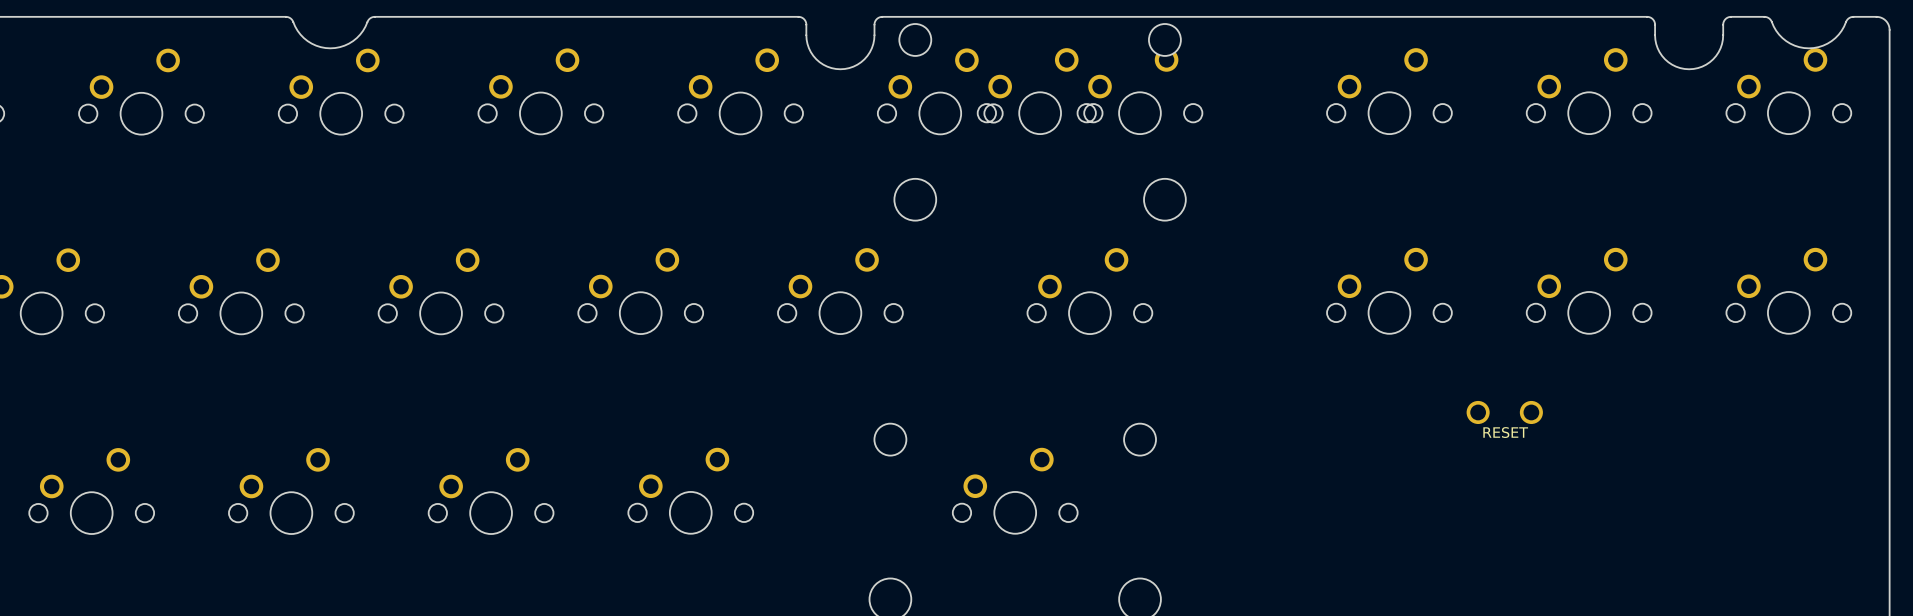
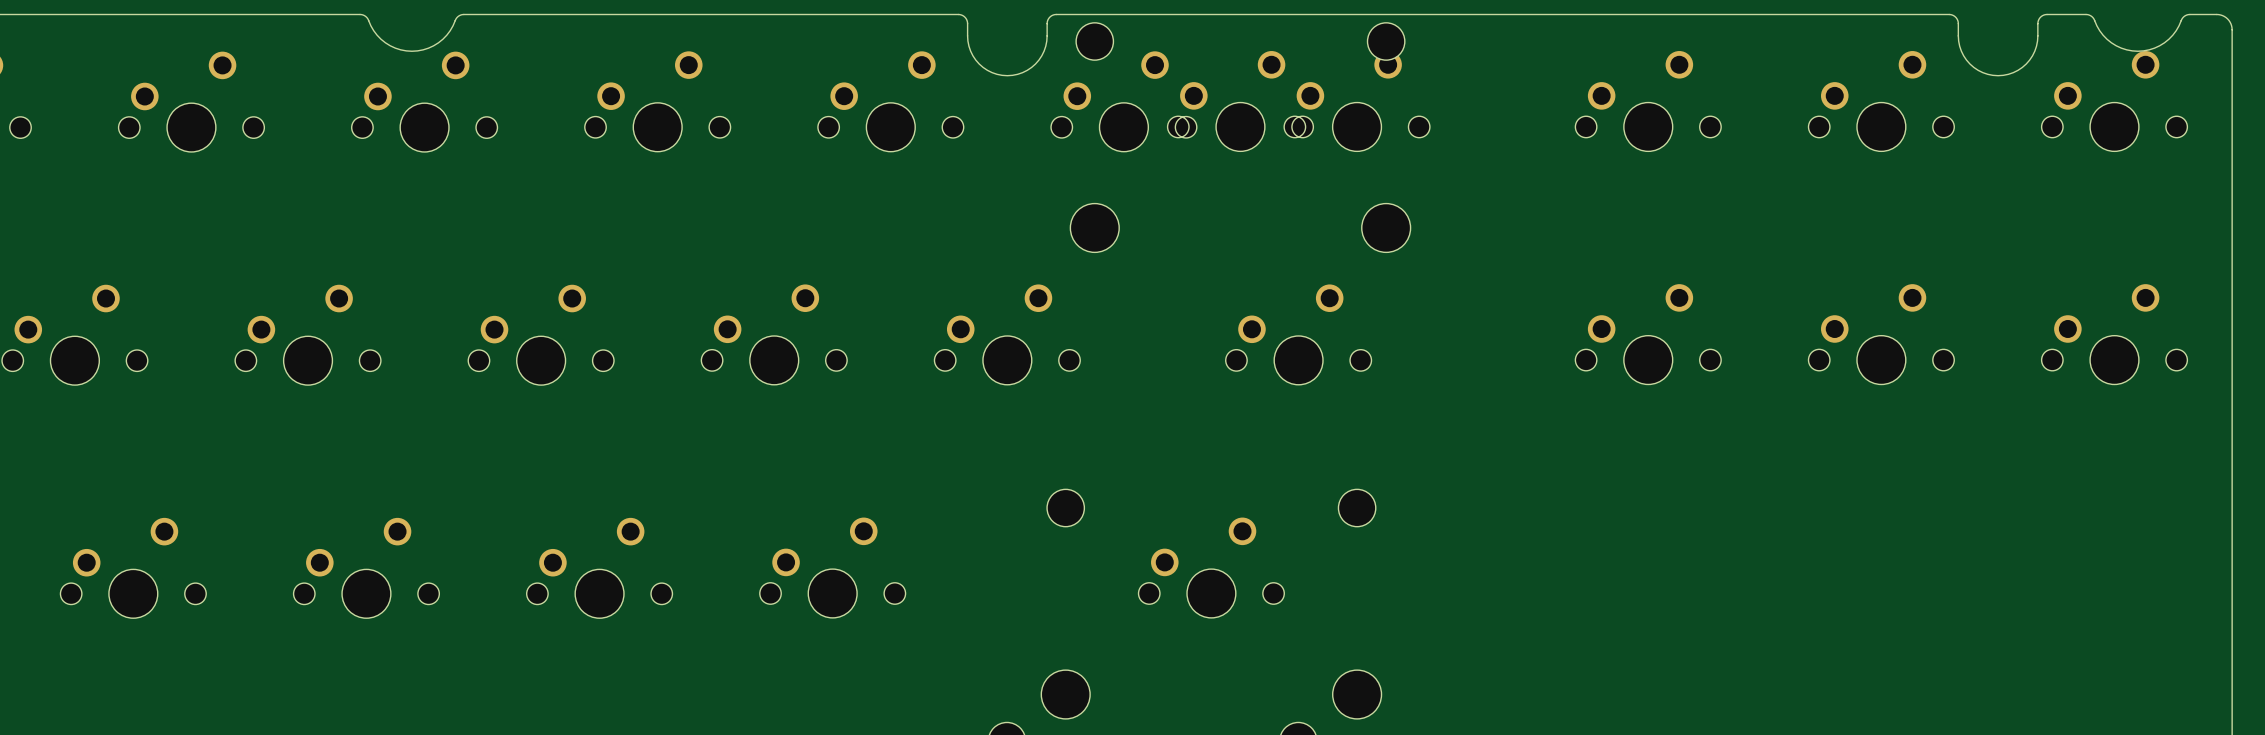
part: (1504, 412) -> none

